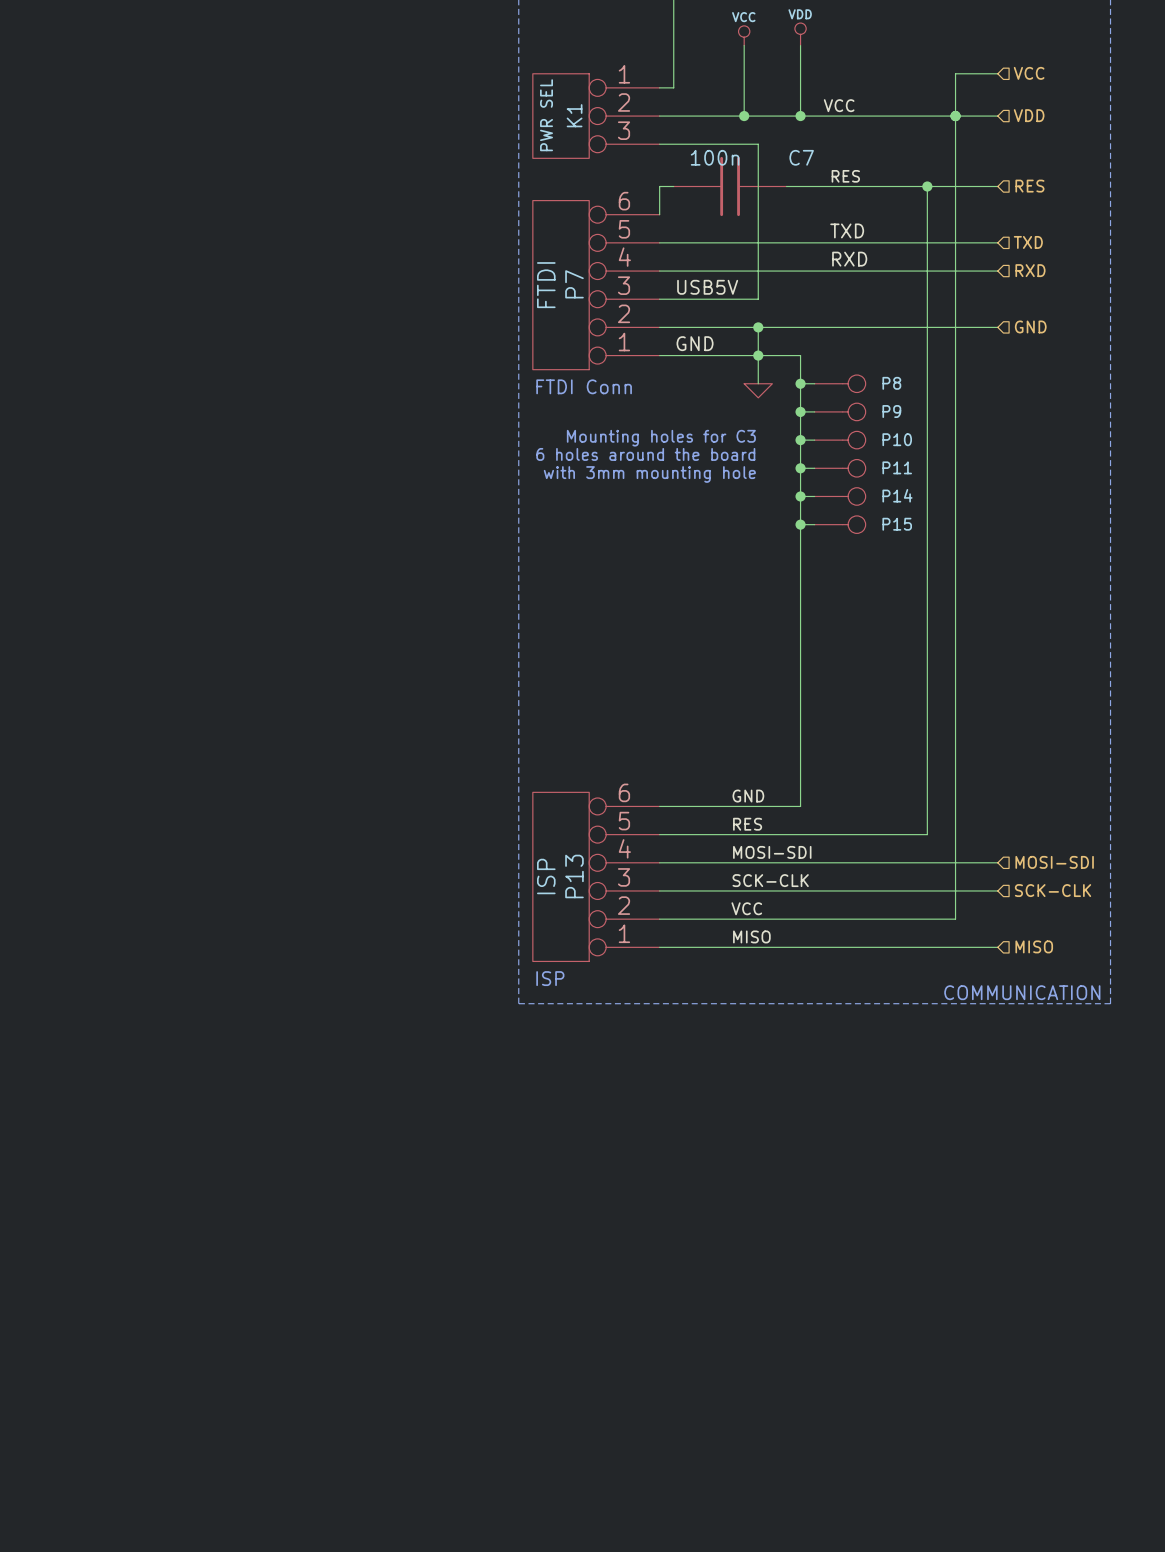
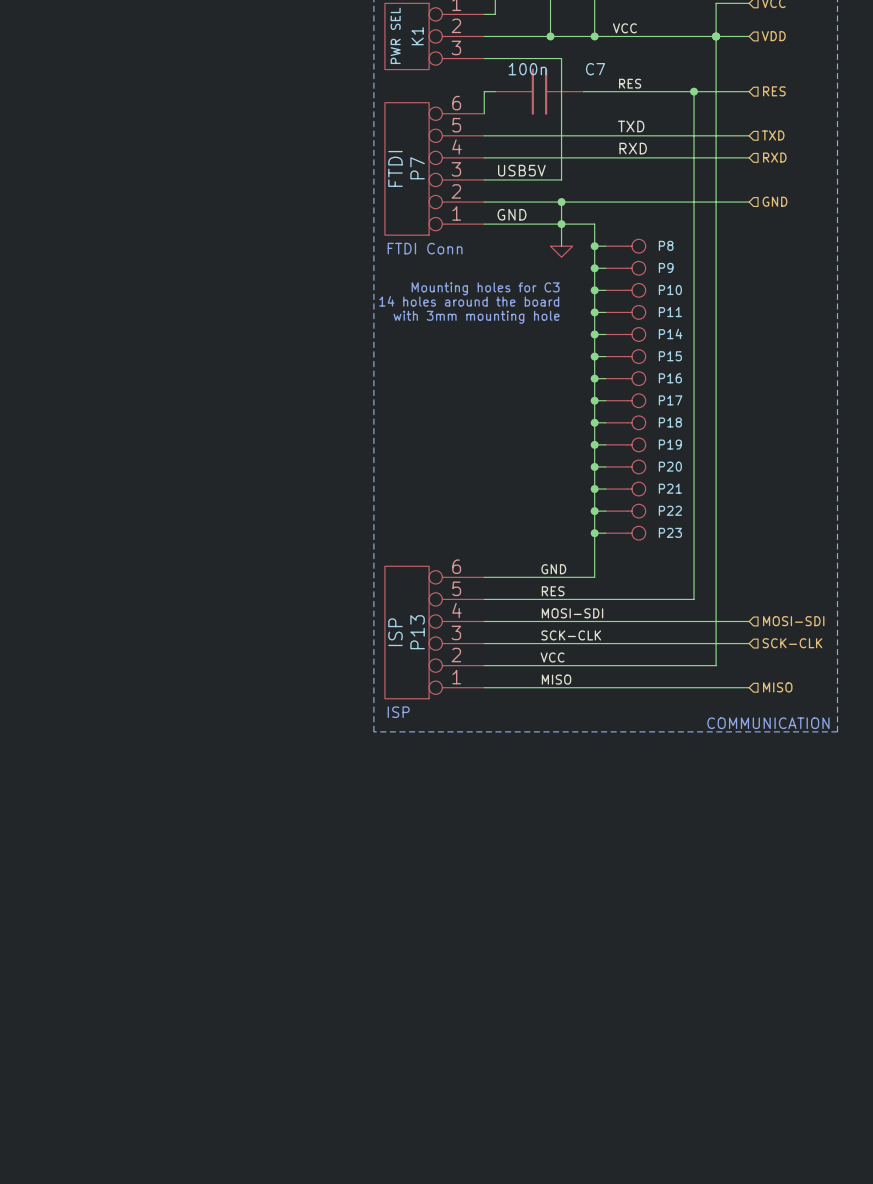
text: 6 holes around the board (645, 454) -> 14 holes around the board (469, 301)
wire: none -> (594, 378) (605, 378)
junction: none -> (594, 378)
P16: none -> (625, 378)
wire: none -> (594, 400) (605, 400)
junction: none -> (594, 400)
P17: none -> (625, 400)
wire: none -> (594, 422) (605, 422)
junction: none -> (594, 422)
P18: none -> (625, 422)
wire: none -> (594, 444) (605, 444)
junction: none -> (594, 444)
P19: none -> (625, 444)
wire: none -> (594, 466) (605, 466)
junction: none -> (594, 466)
P20: none -> (625, 466)
wire: none -> (594, 489) (605, 489)
junction: none -> (594, 489)
P21: none -> (625, 489)
wire: none -> (594, 511) (605, 511)
junction: none -> (594, 511)
P22: none -> (625, 511)
wire: none -> (594, 533) (605, 533)
junction: none -> (594, 533)
P23: none -> (625, 533)

